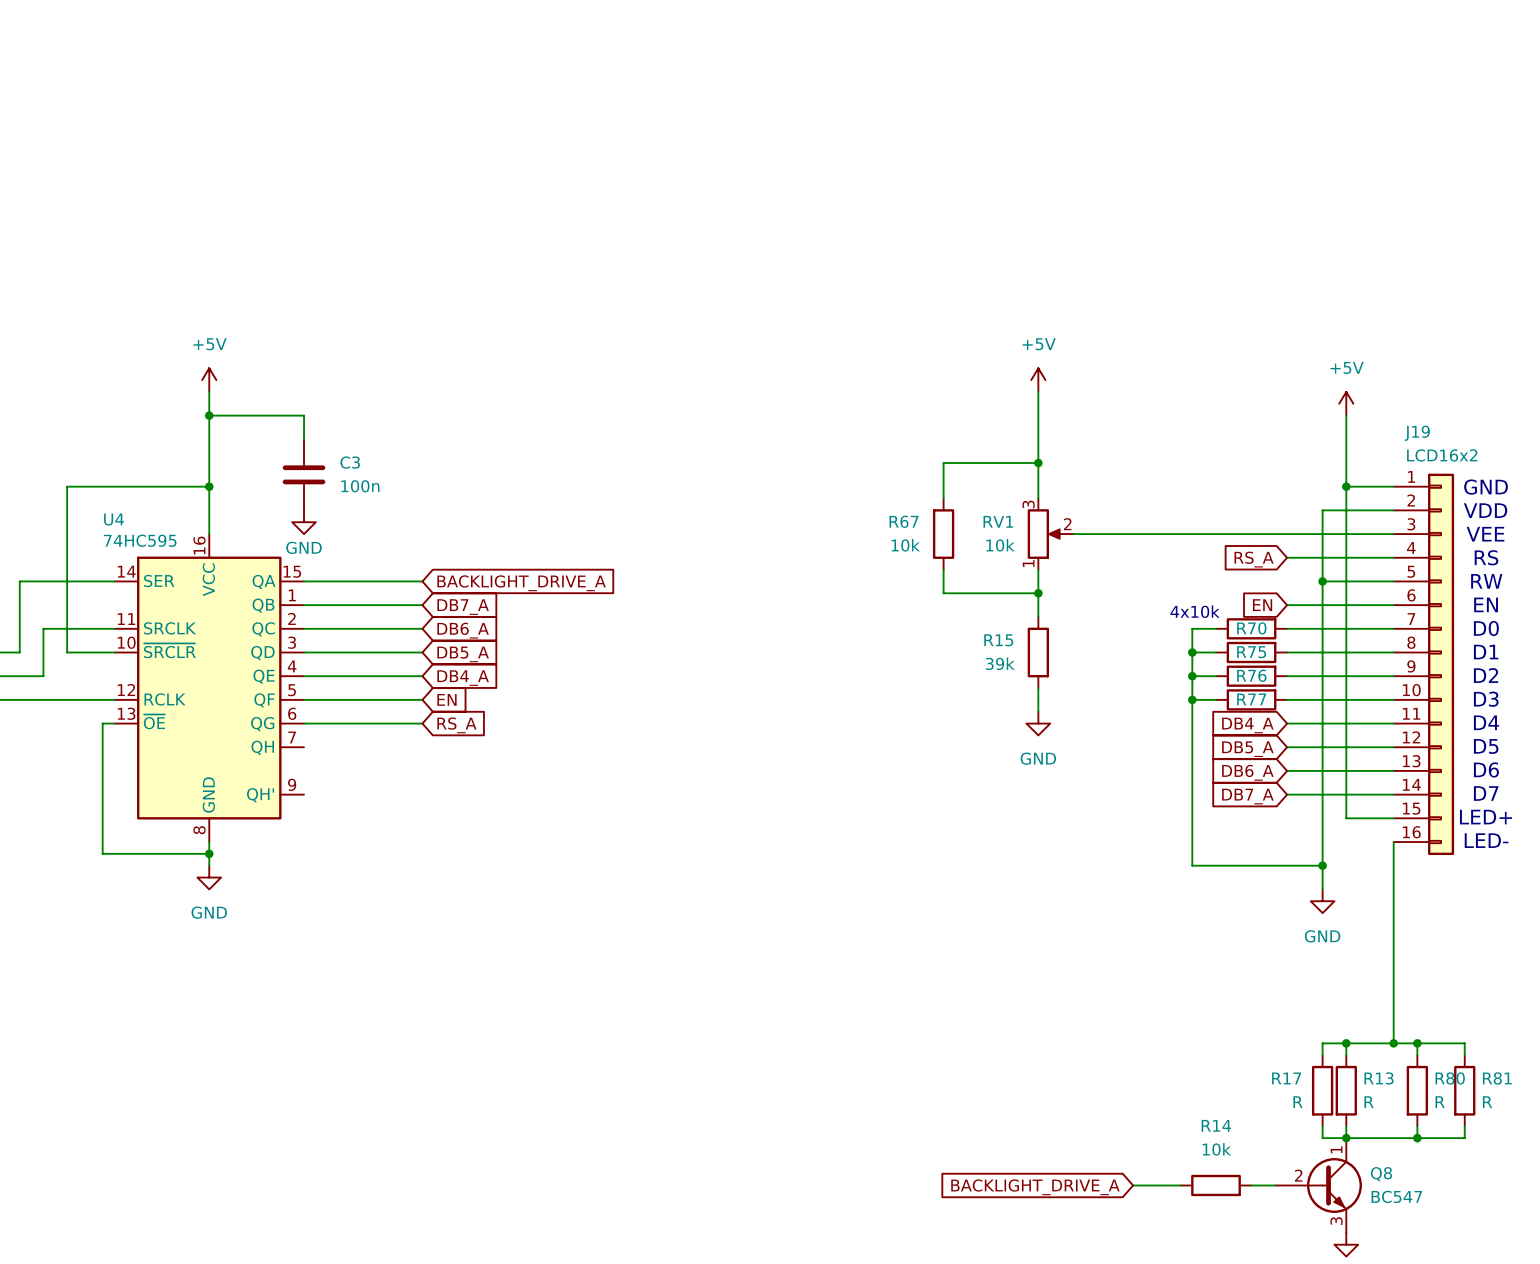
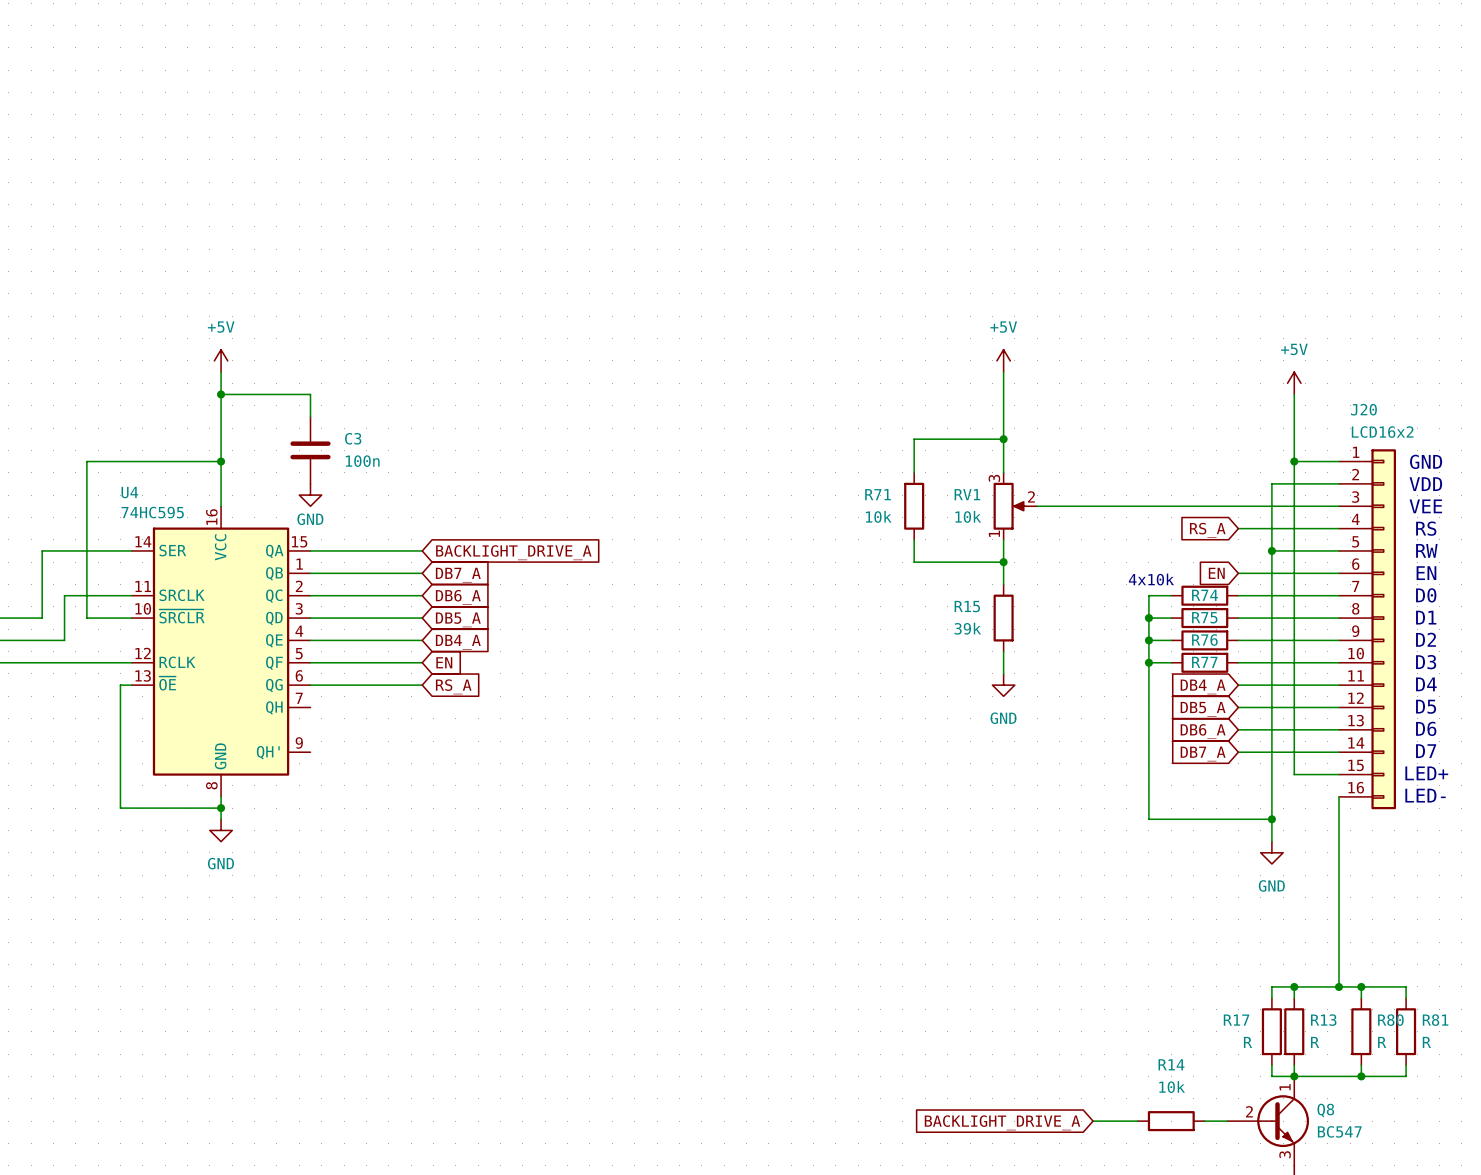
J19 name: J19 (1417, 433) -> J20 (1363, 409)
R67 name: R67 (904, 521) -> R71 (877, 494)
R70 name: R70 (1251, 628) -> R74 (1205, 595)

